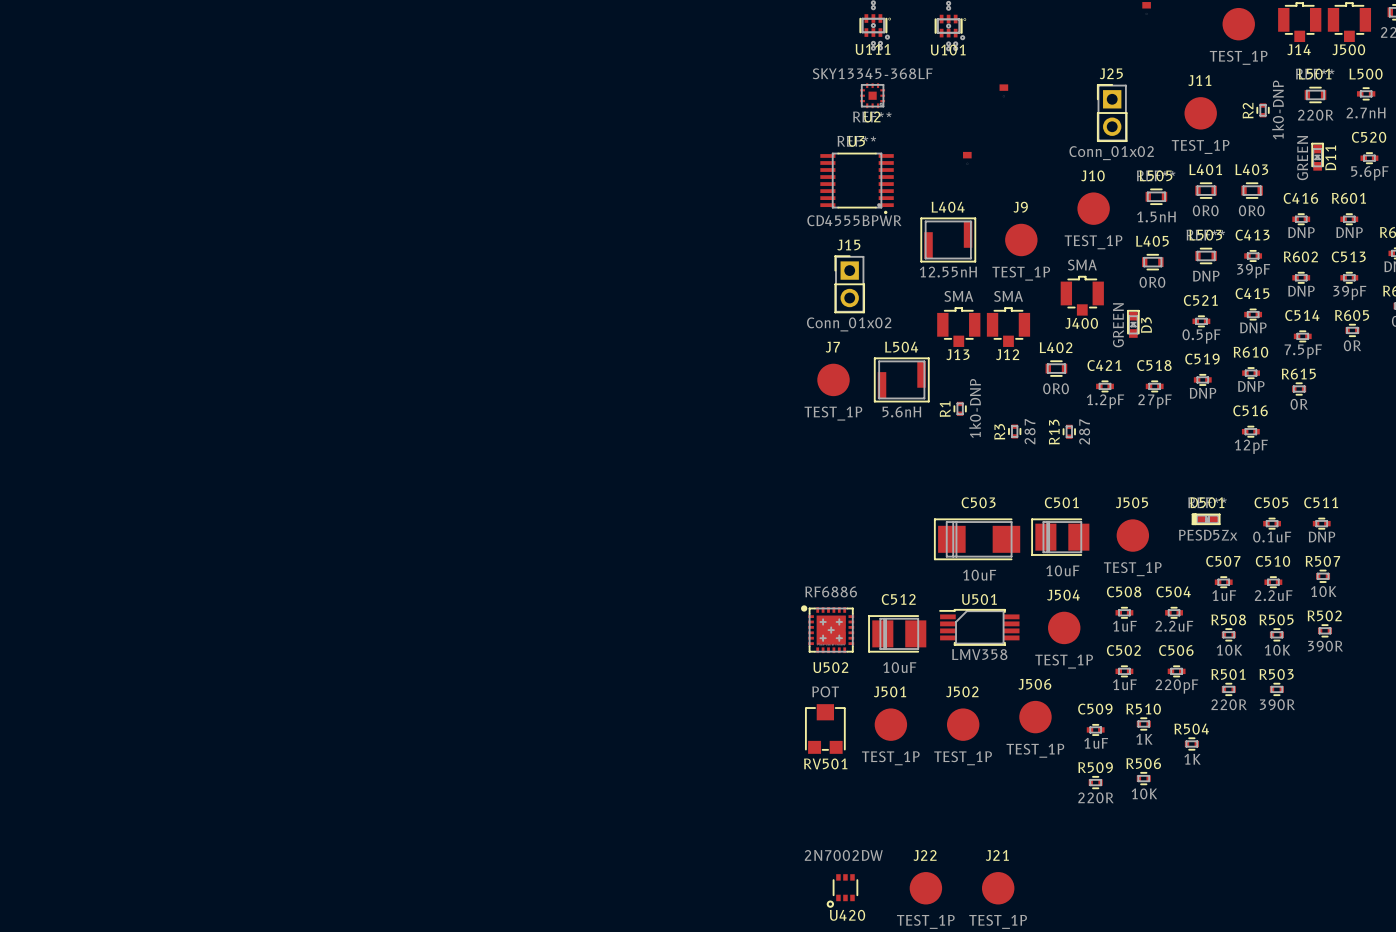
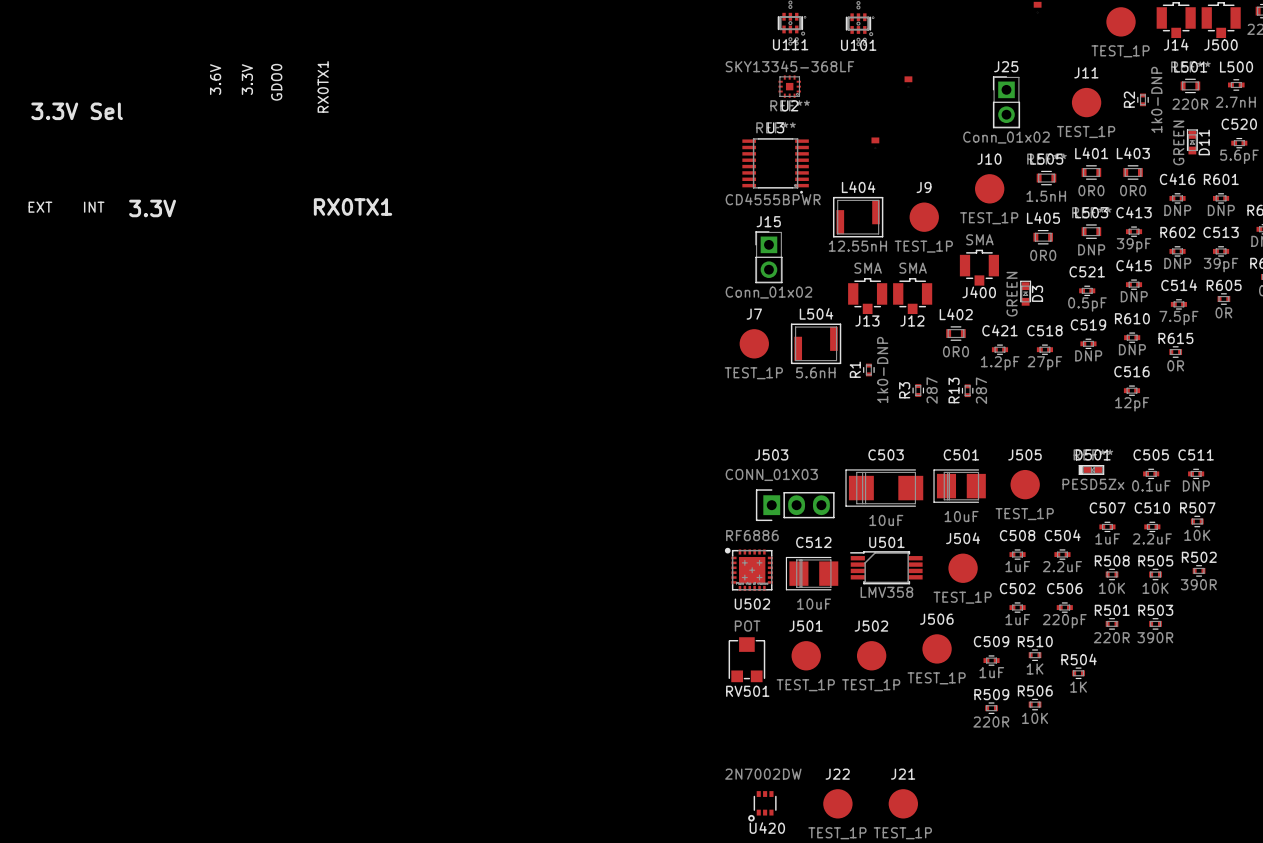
text: none -> 3.6V (215, 79)
text: none -> 3.3V (247, 79)
text: none -> GDO0 (276, 82)
text: none -> RX0TX1 (323, 86)
text: none -> 3.3V Sel (77, 111)
text: none -> EXT (40, 207)
text: none -> INT (94, 207)
text: none -> RX0TX1 (353, 207)
text: none -> 3.3V (152, 208)
J503: none -> CONN_01X03 (795, 505)

